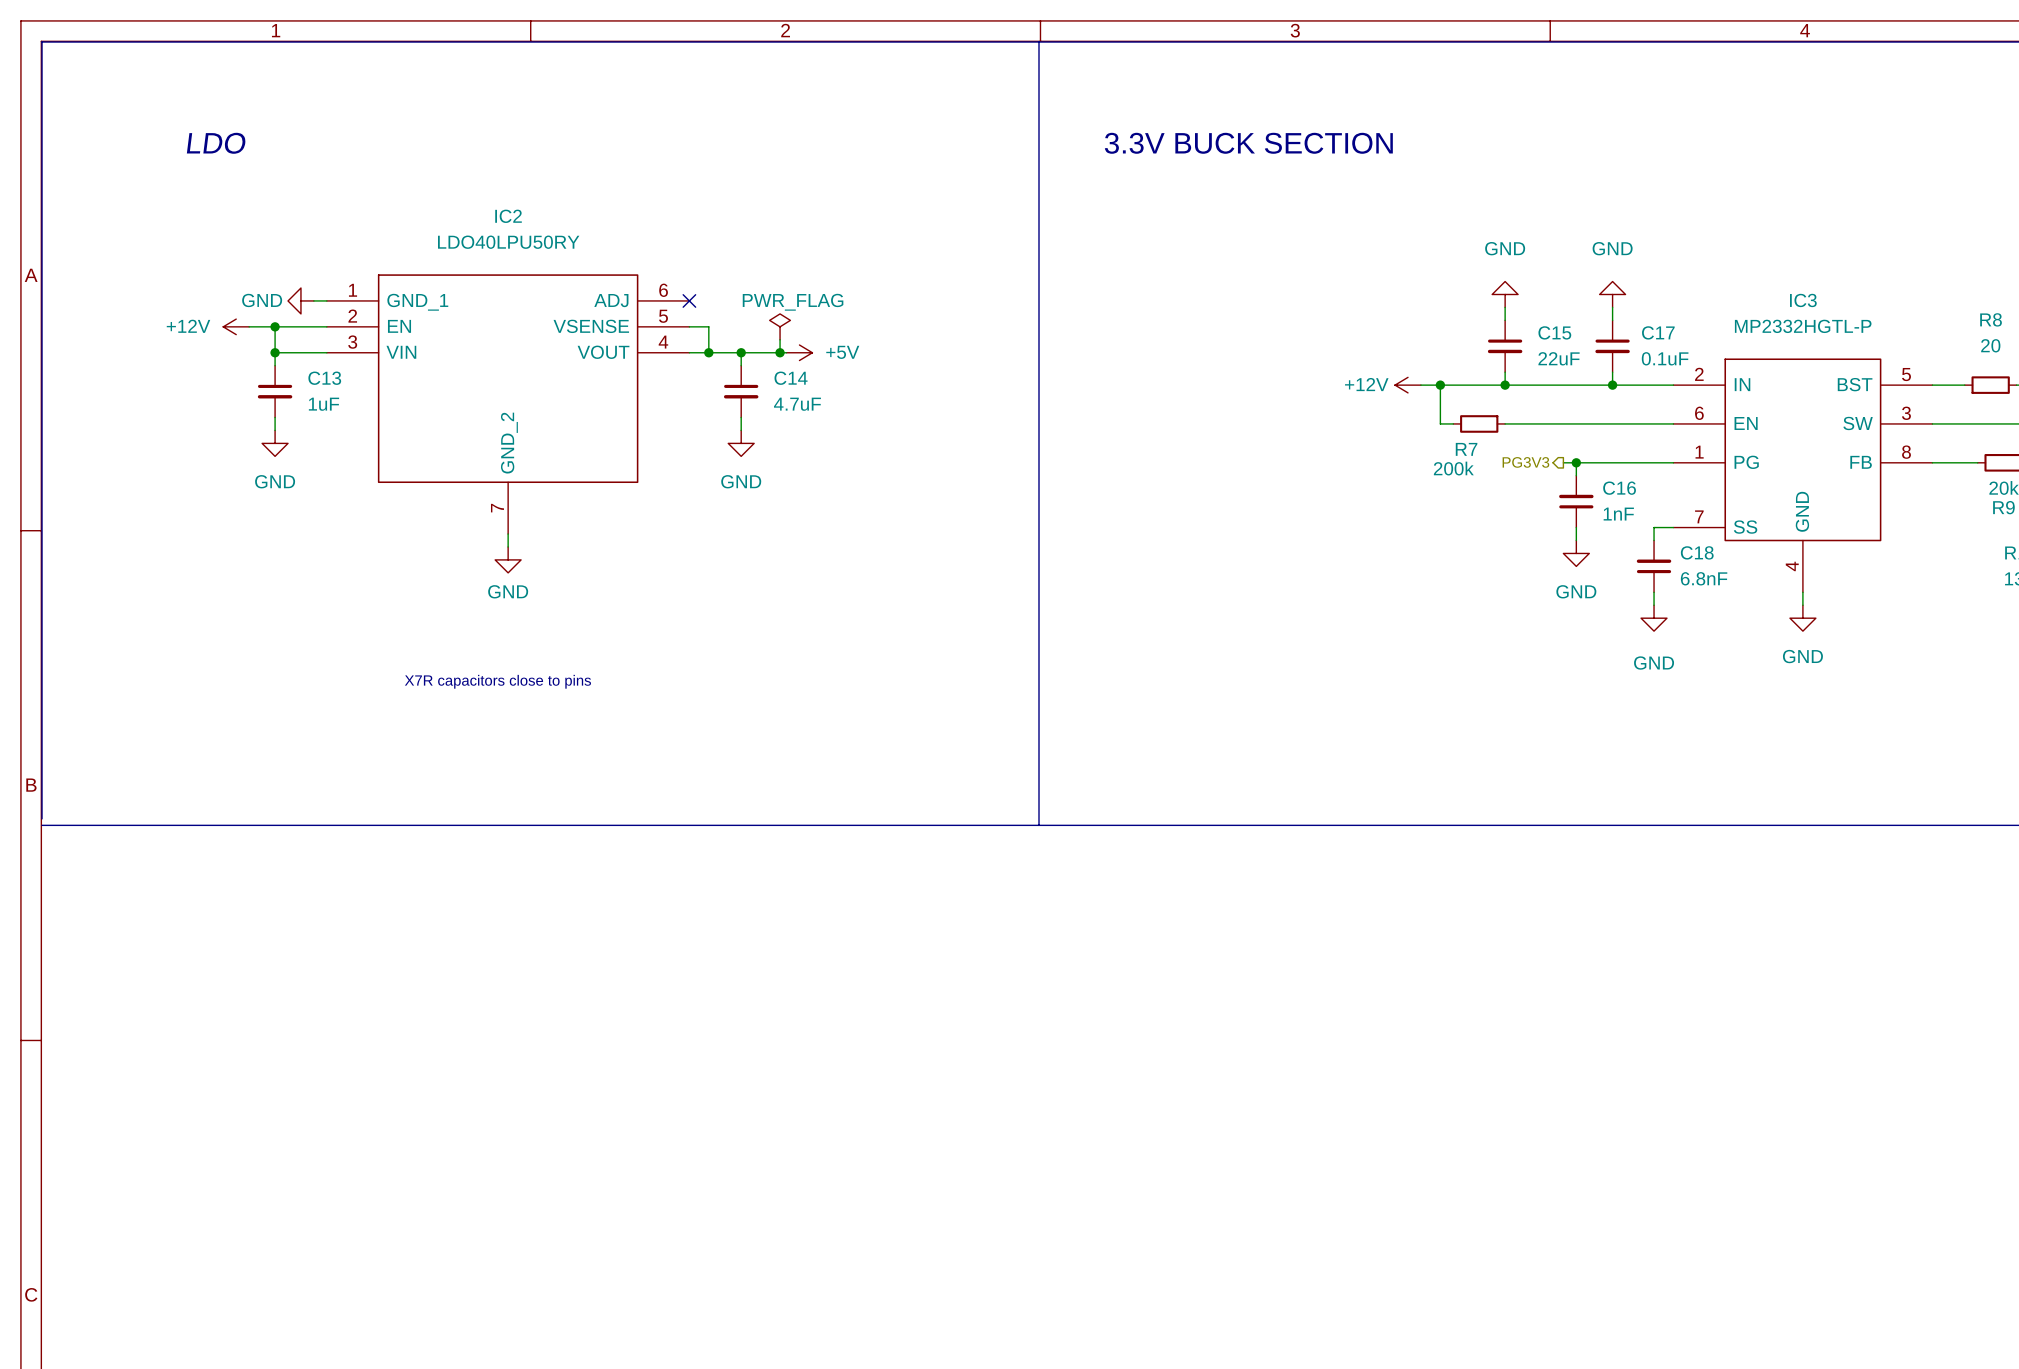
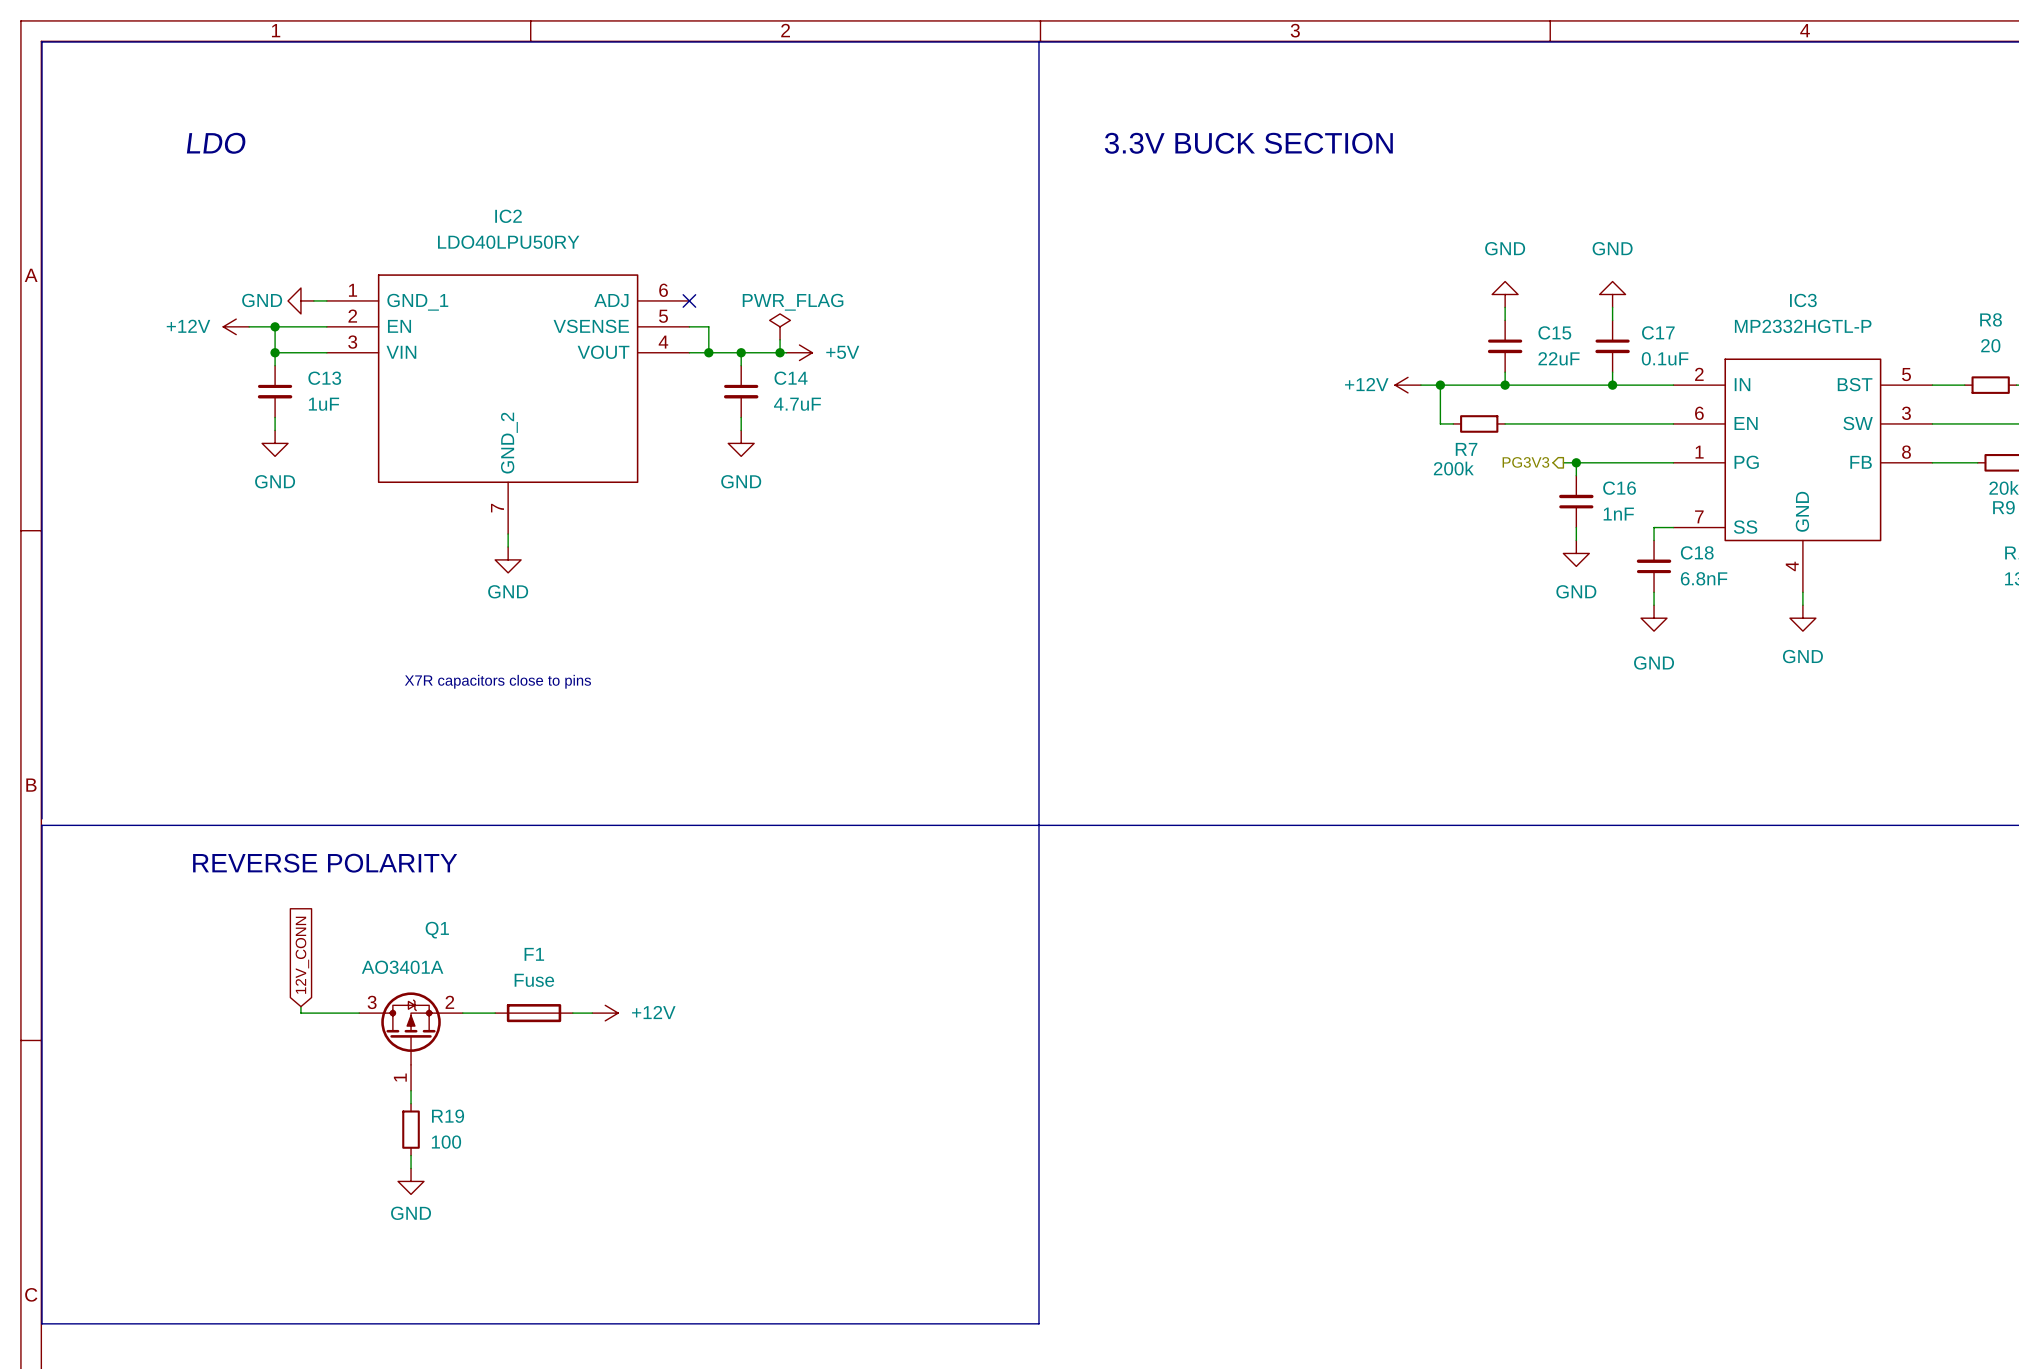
line: none -> (42, 825) (42, 1323) (1038, 1323) (1038, 825)
text: none -> REVERSE POLARITY (325, 863)
global label: none -> 12V_CONN (302, 955)
wire: none -> (300, 1006) (300, 1013) (359, 1013)
wire: none -> (462, 1013) (495, 1013)
F1: none -> Fuse (534, 1013)
wire: none -> (572, 1013) (592, 1013)
power symbol: none -> +12V (605, 1013)
Q1: none -> AO3401A (411, 1041)
wire: none -> (411, 1090) (411, 1103)
R19: none -> 100 (411, 1129)
wire: none -> (411, 1155) (411, 1168)
power symbol: none -> GND (411, 1181)

